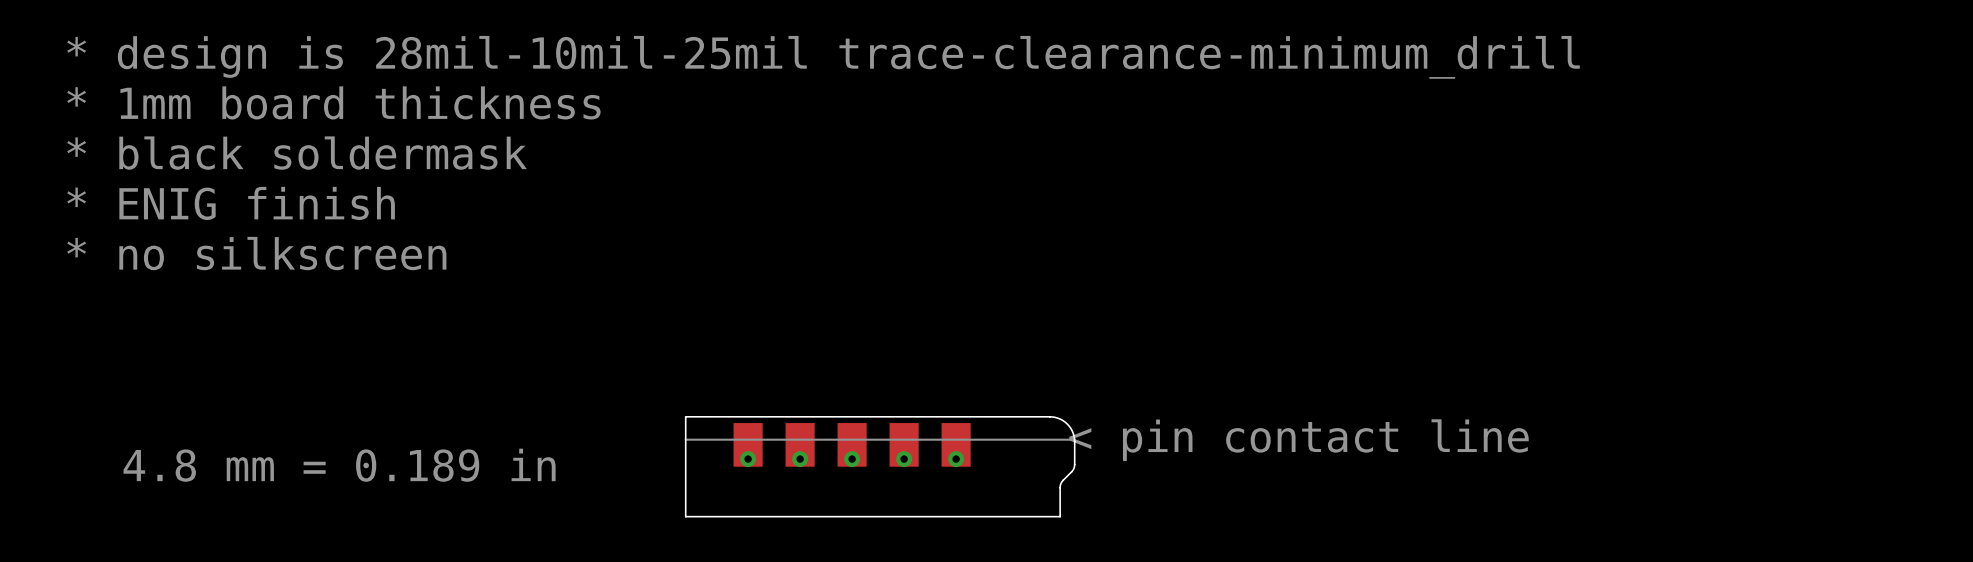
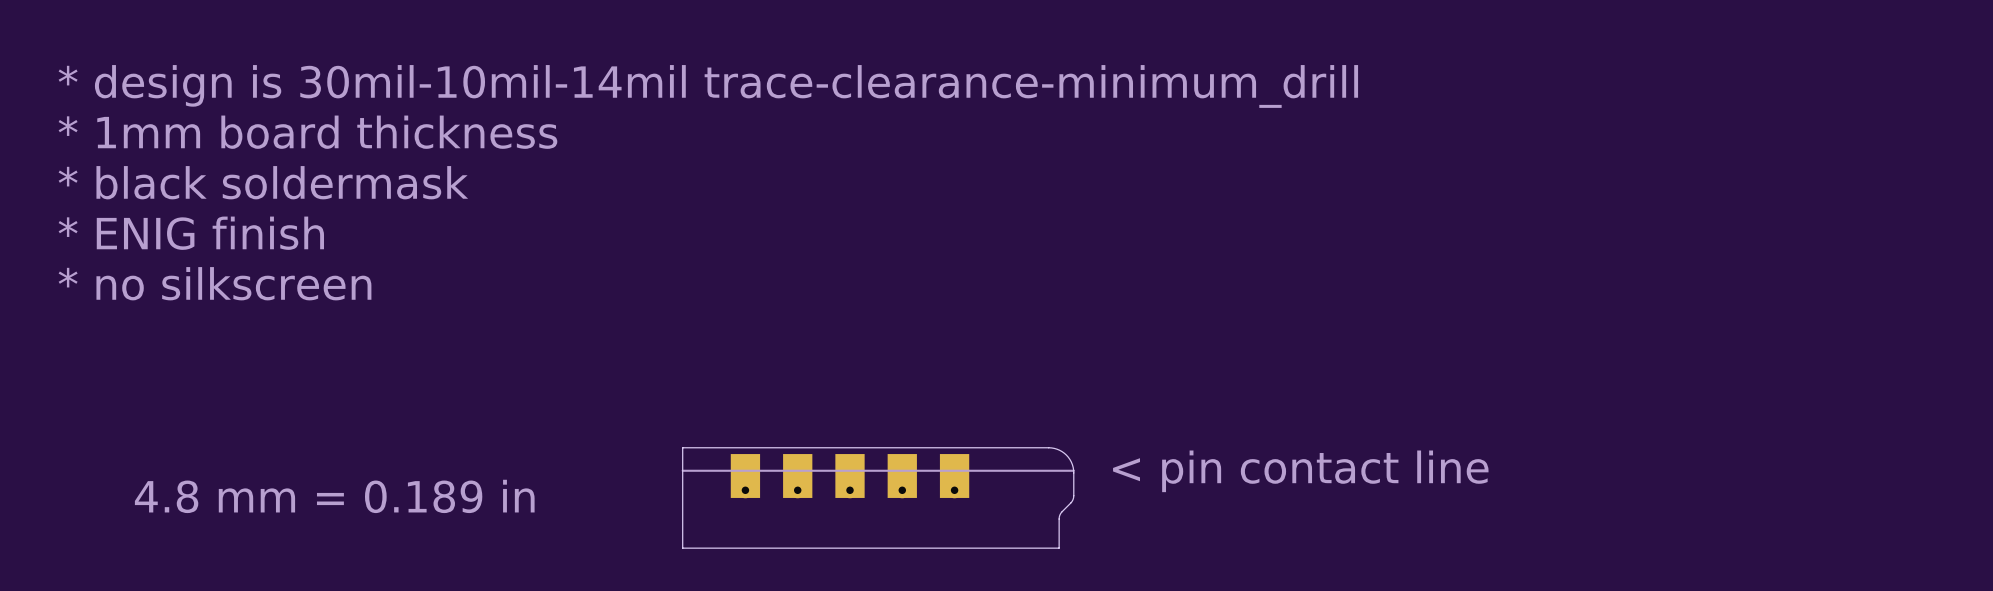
text: * design is 28mil-10mil-25mil trace-clearance-minimum_drill (823, 57) -> * design is 30mil-10mil-14mil trace-clearance-minimum_drill (708, 86)

